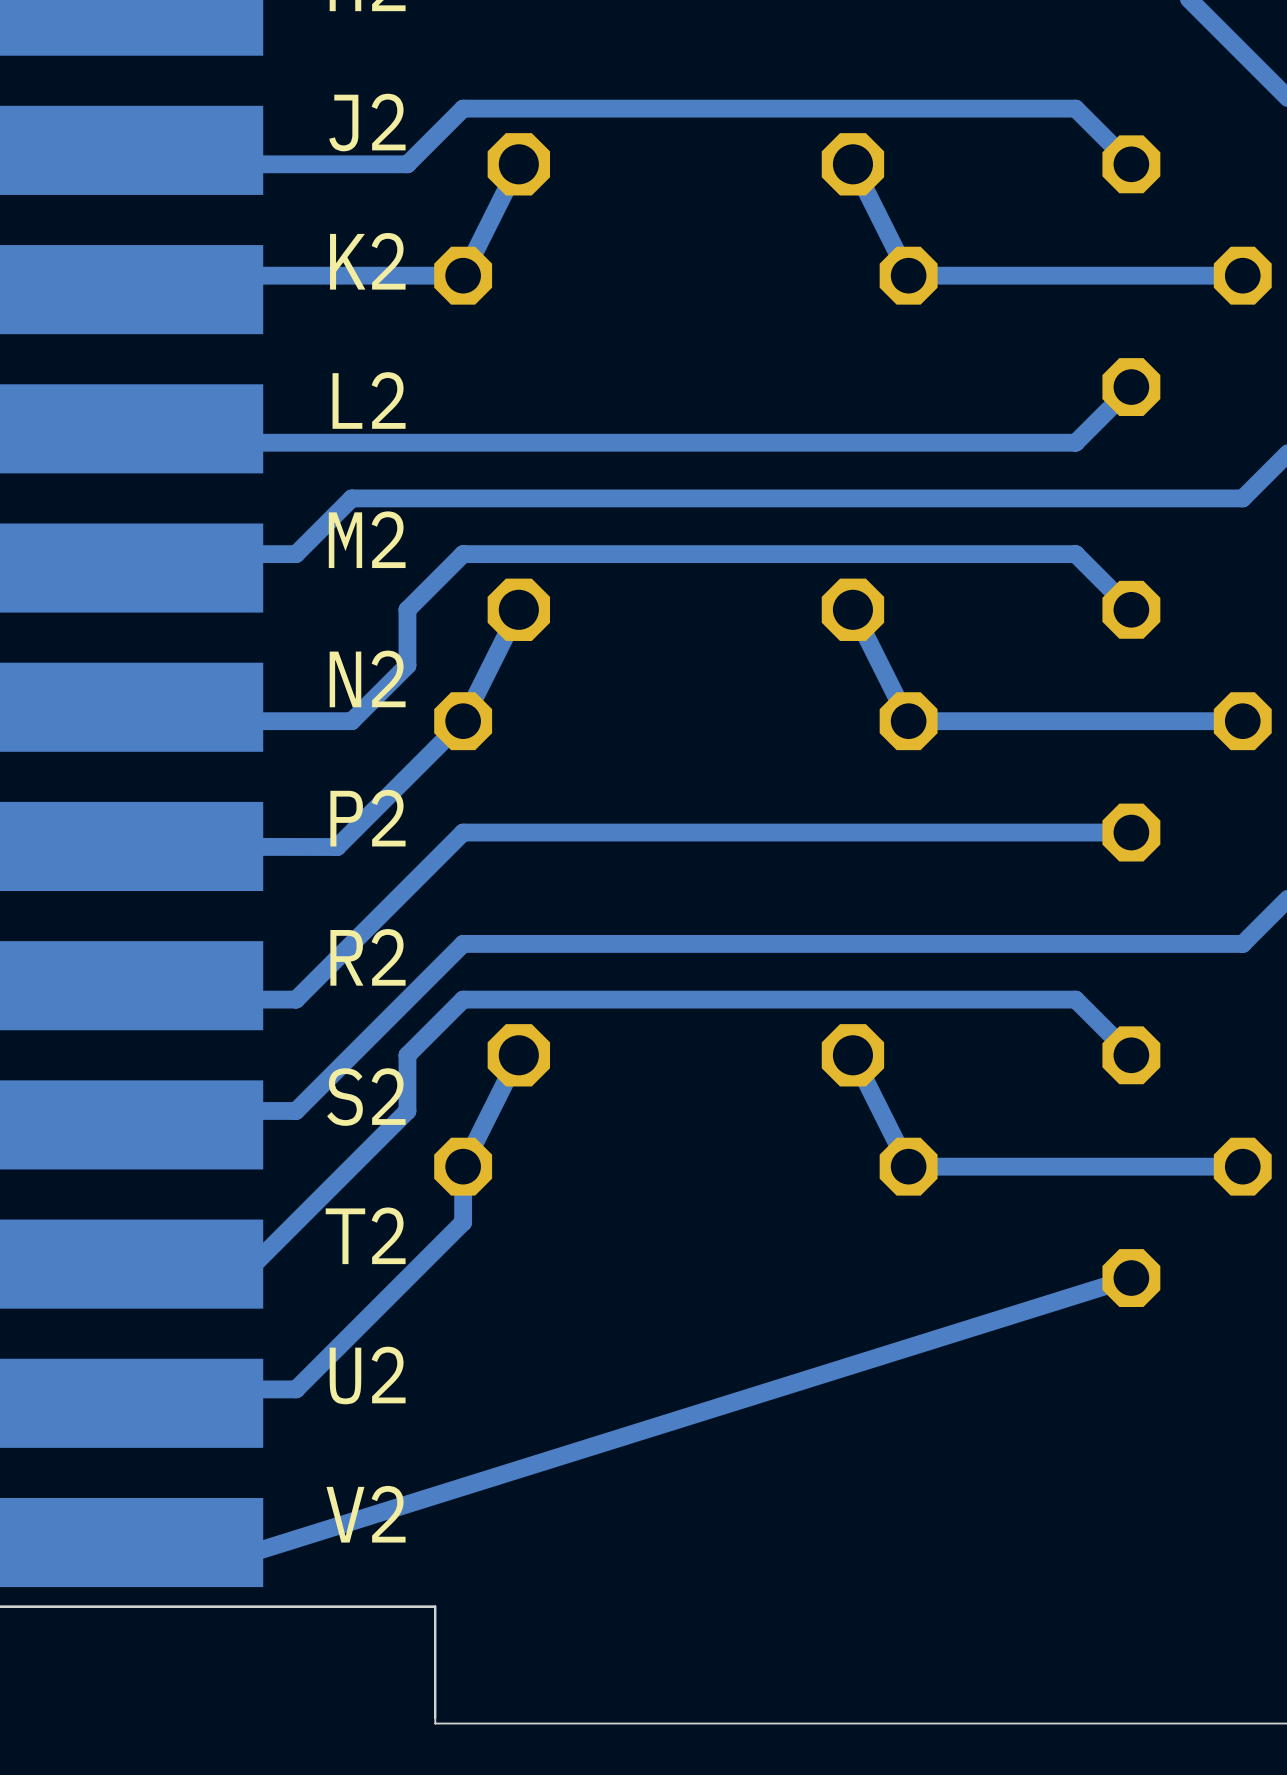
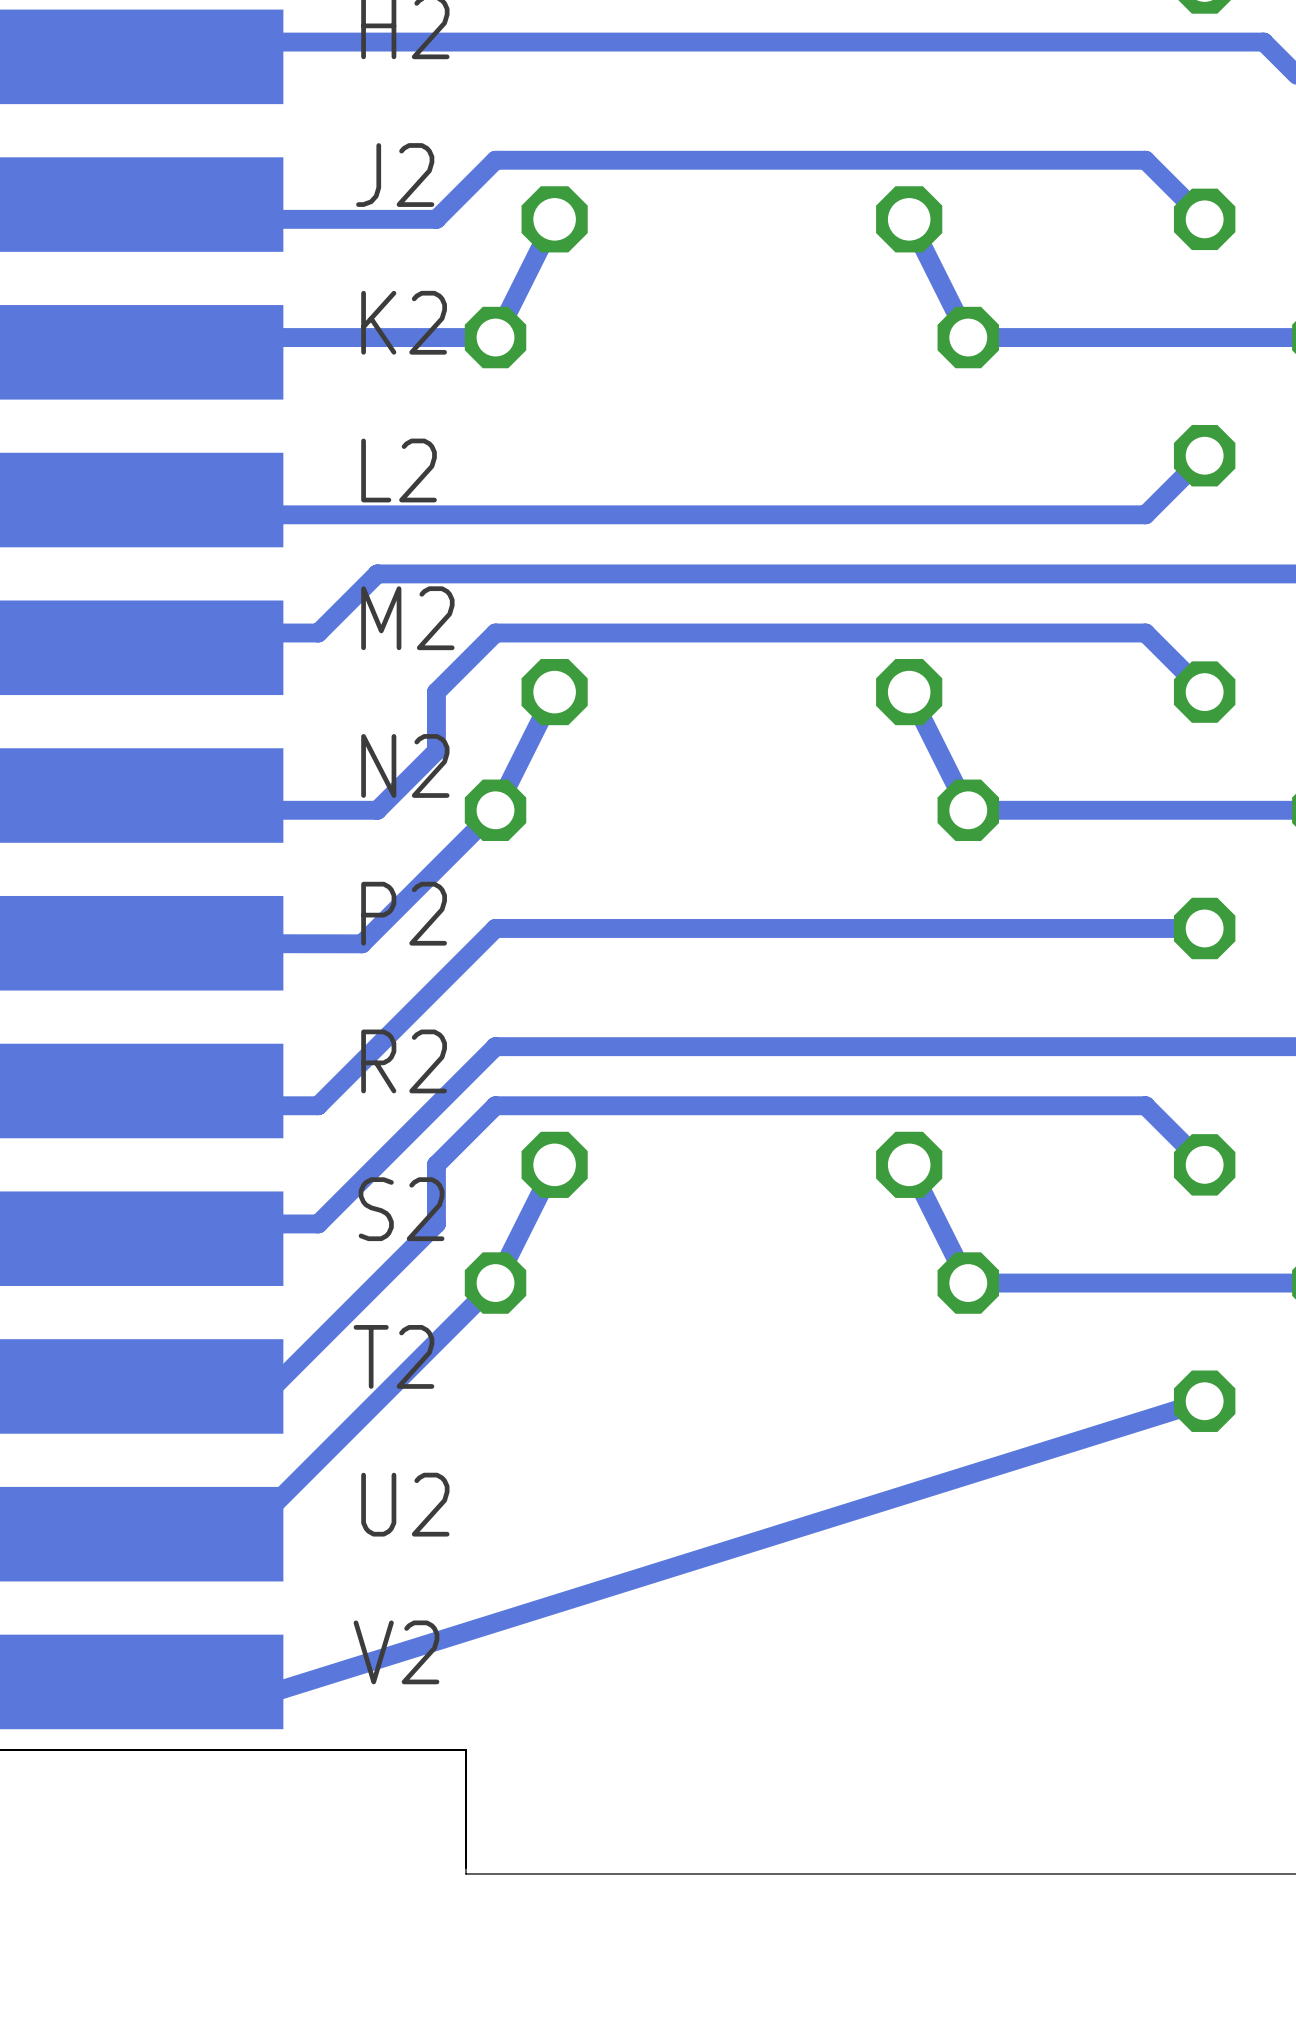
track: (463, 1166) (463, 1222) (296, 1389) (240, 1389) -> (495, 1283) (259, 1519)

